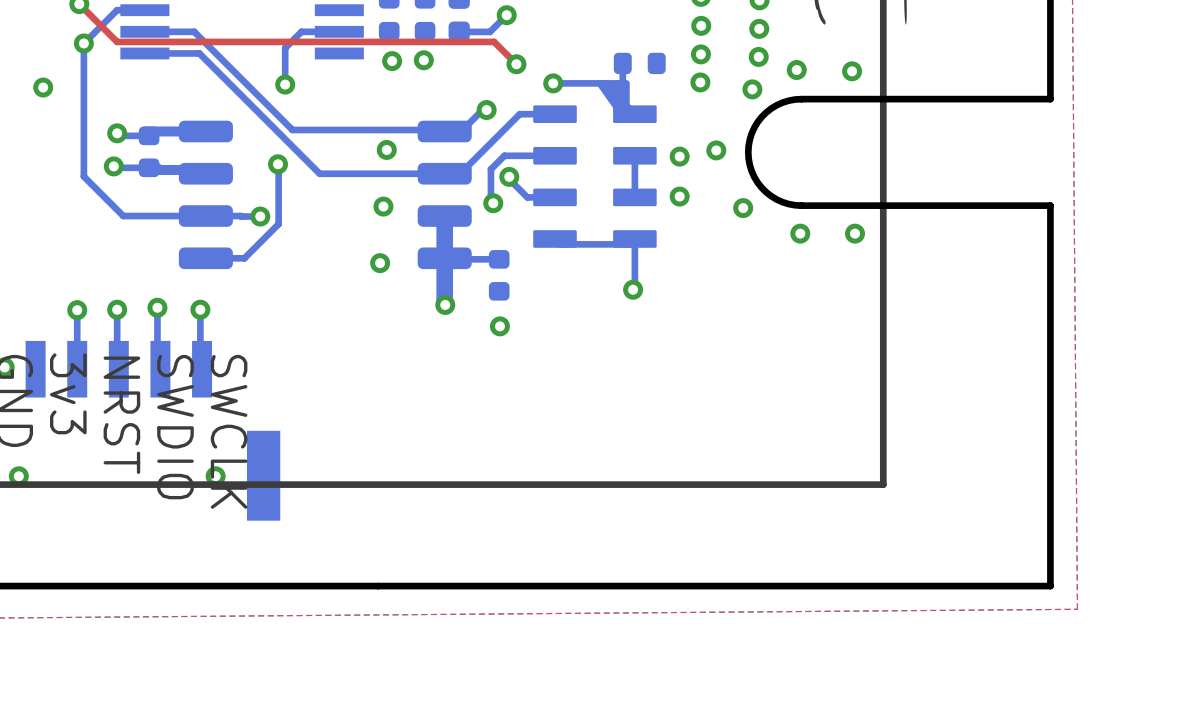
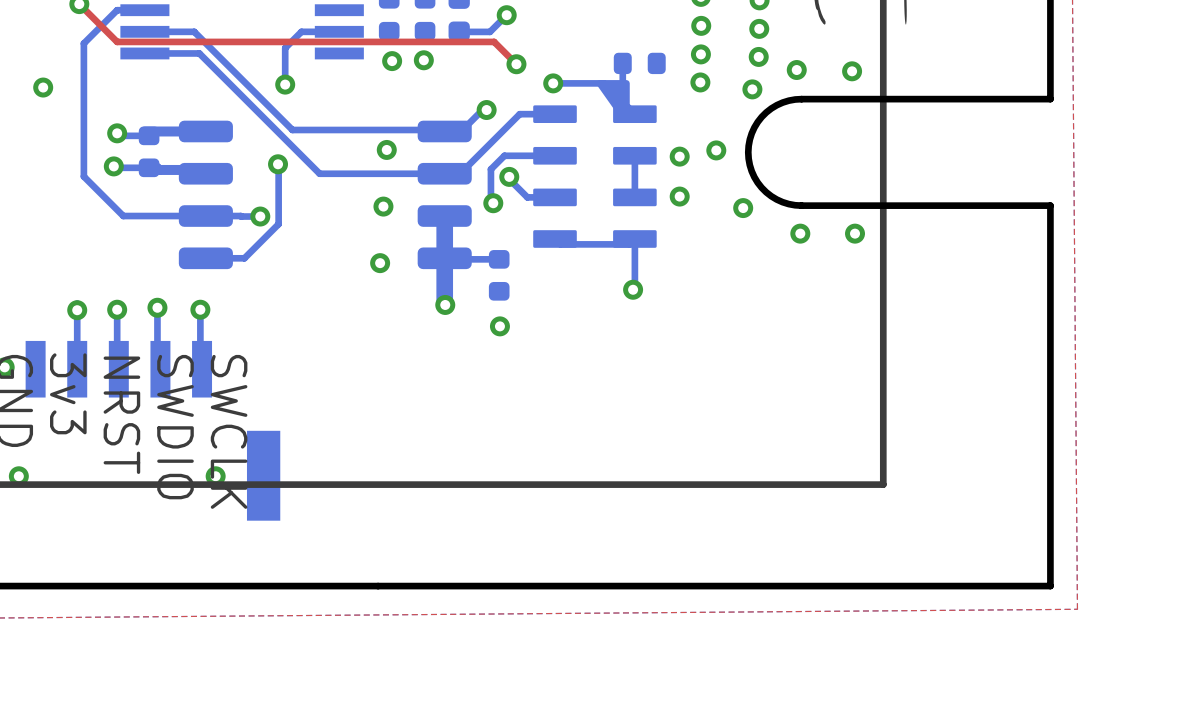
via: (83, 43) -> none

